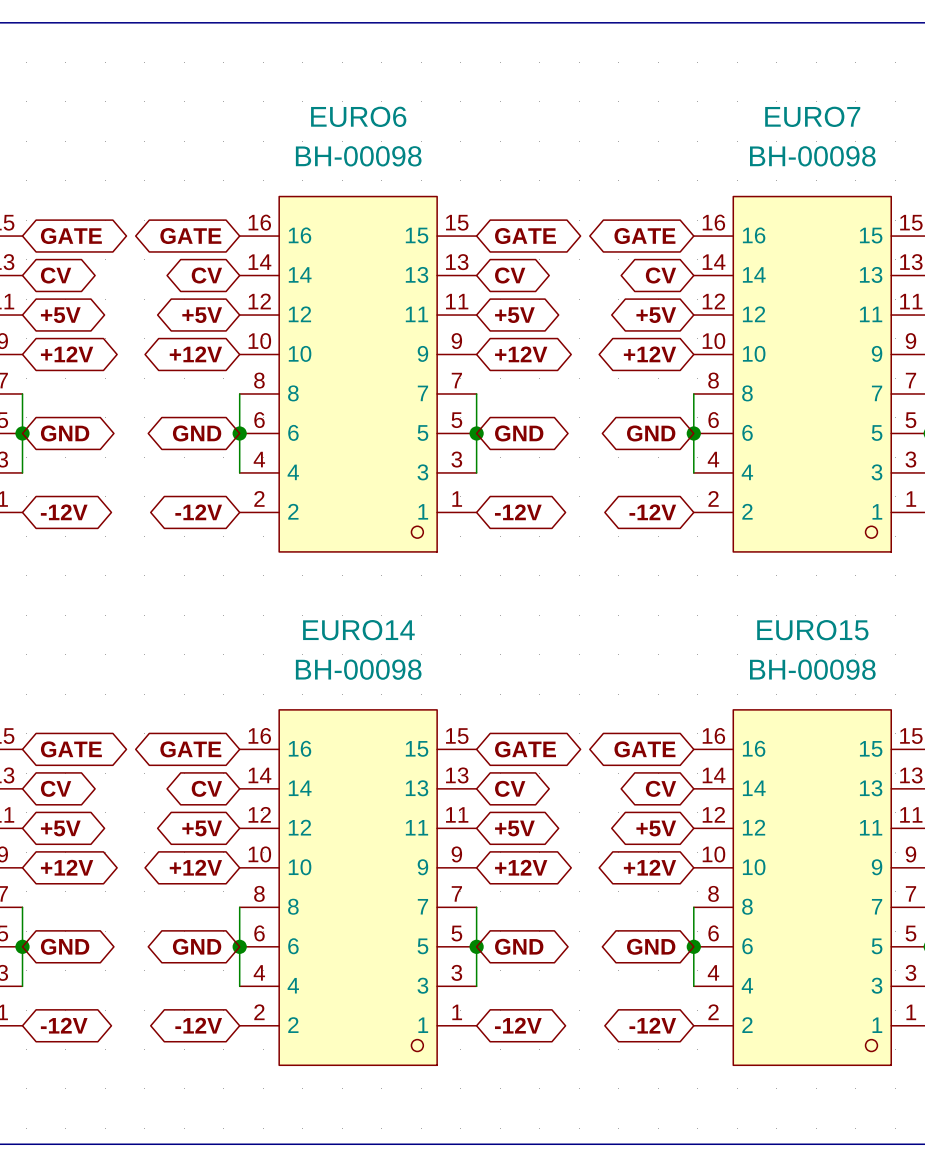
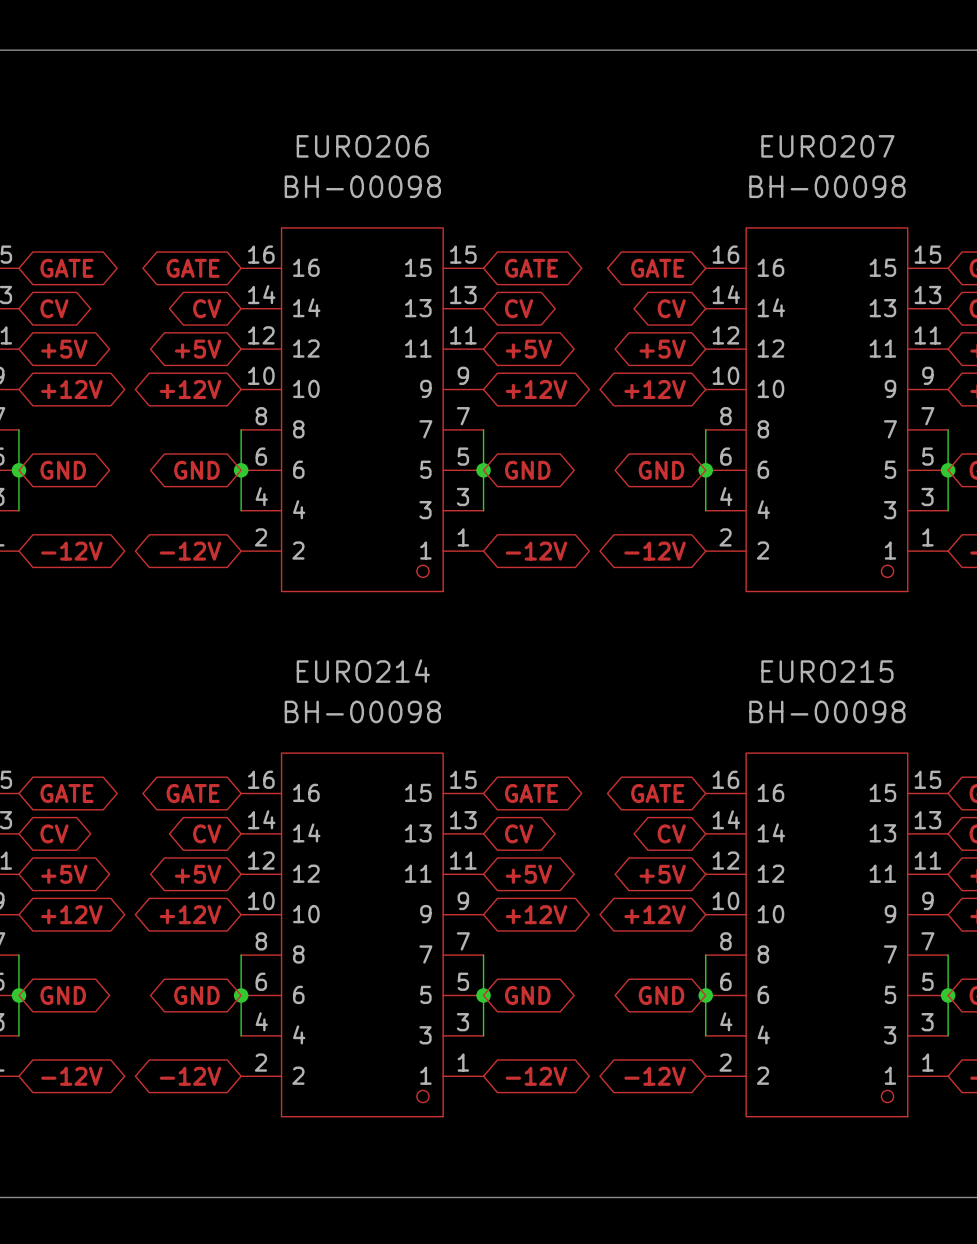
EURO6 name: EURO6 (358, 116) -> EURO206 (362, 146)
EURO7 name: EURO7 (812, 116) -> EURO207 (827, 146)
EURO14 name: EURO14 (358, 630) -> EURO214 (363, 671)
EURO15 name: EURO15 (812, 630) -> EURO215 (827, 671)

